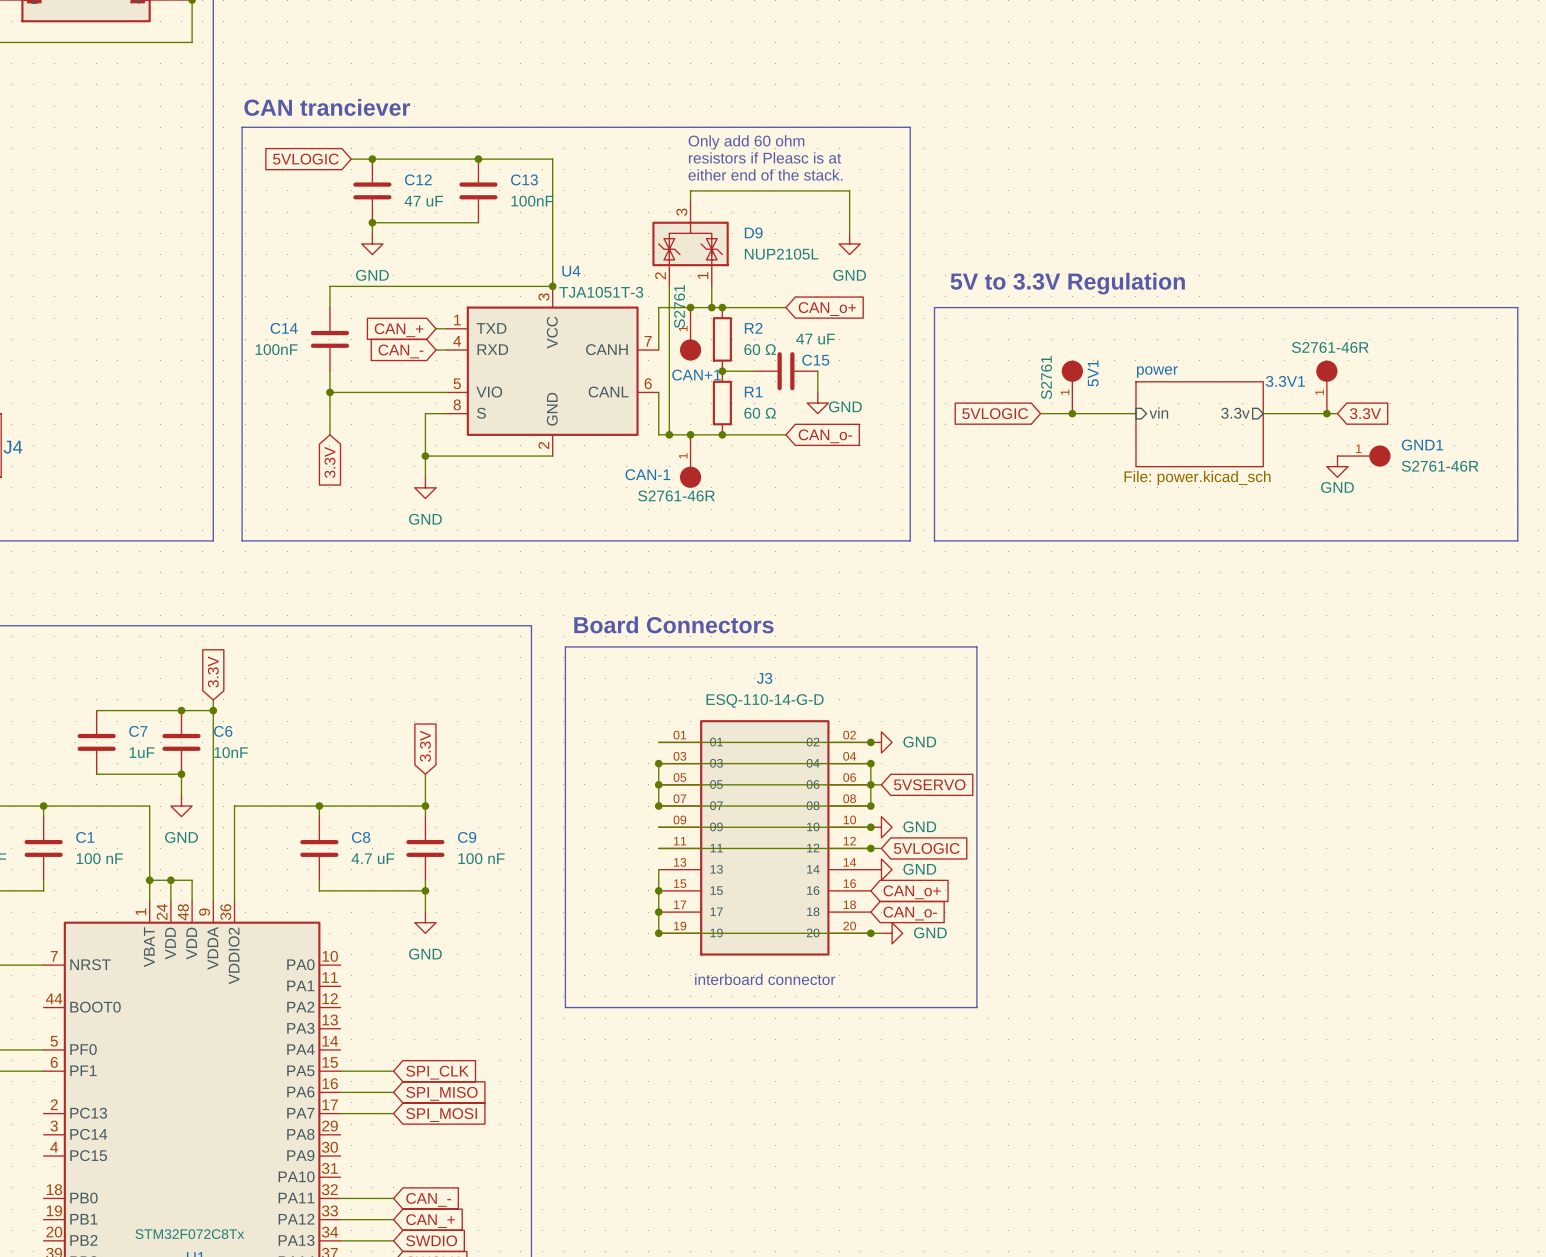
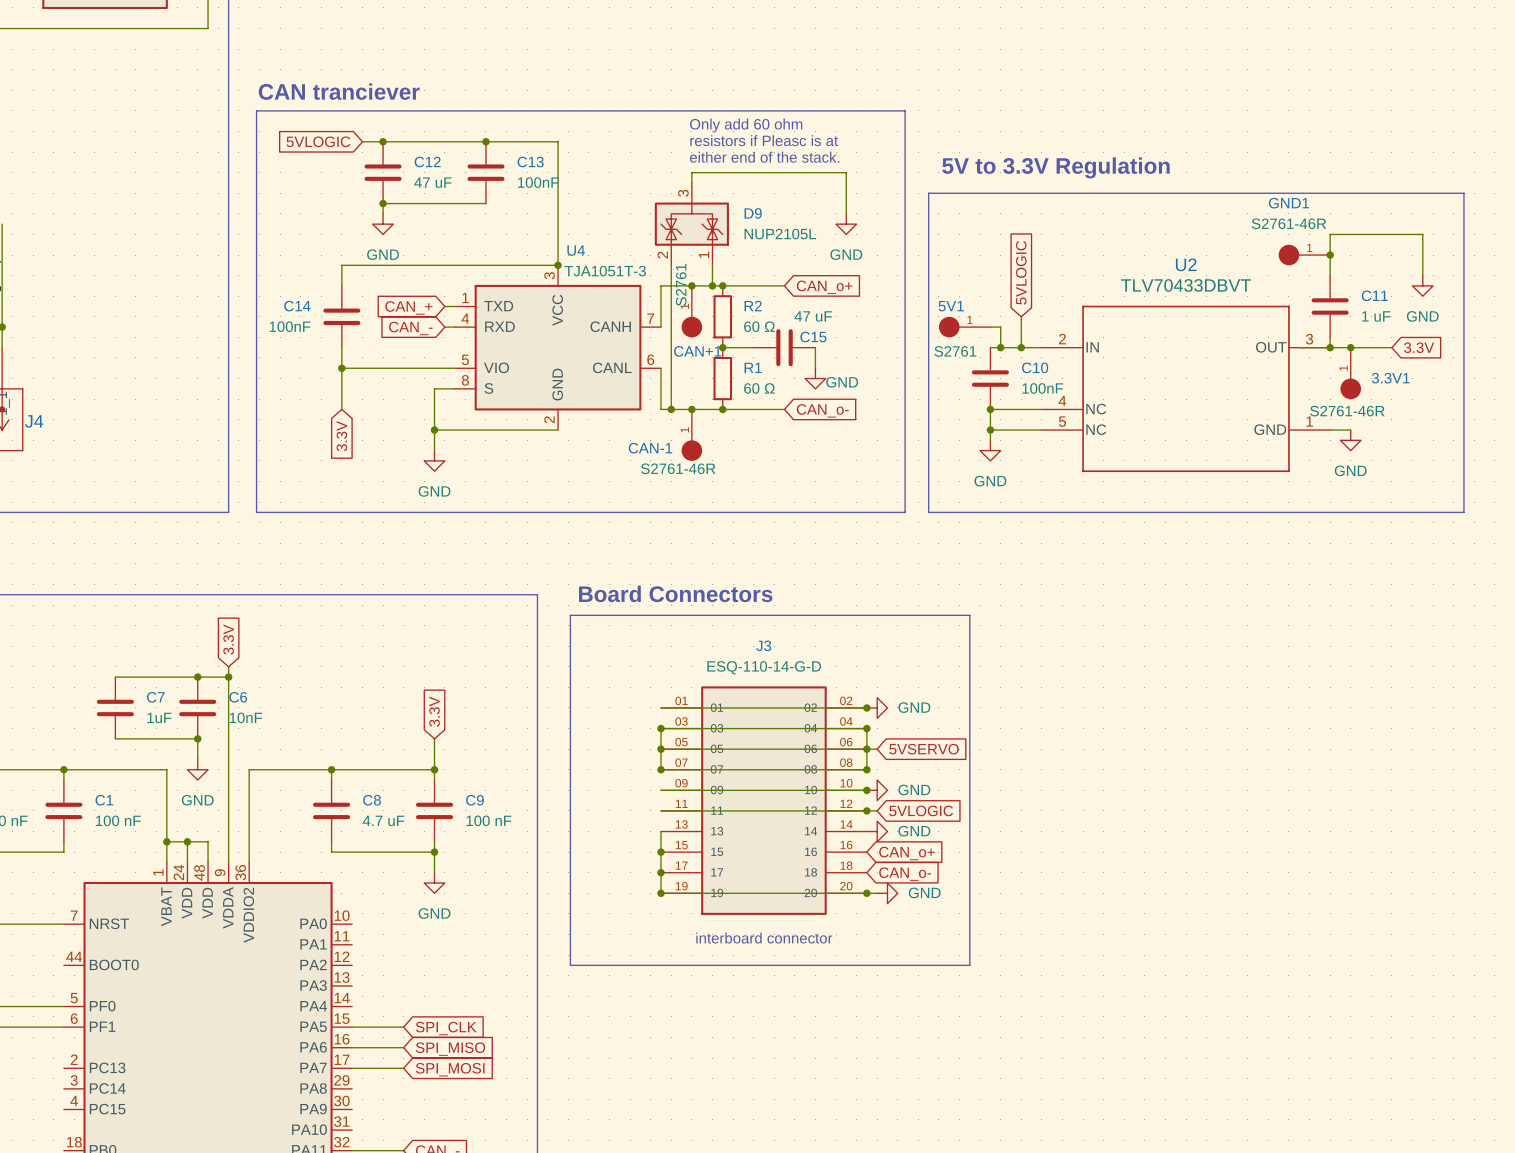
junction: none -> (1330, 255)
text position: 5V to 3.3V Regulation (1067, 283) -> 5V to 3.3V Regulation (1055, 167)
wire: none -> (1330, 275) (1330, 234) (1422, 234) (1422, 275)
line: (934, 307) (1517, 307) (1517, 540) (1485, 540) -> (928, 285) (928, 193) (1463, 193) (1463, 512)
power symbol: none -> GND (1422, 285)
C11: none -> 1 uF (1330, 306)
wire: none -> (1021, 316) (1021, 347)
wire: none -> (990, 327) (1000, 327) (1000, 347)
wire: none -> (1330, 337) (1330, 347)
wire: none -> (990, 347) (1041, 347)
junction: none -> (1000, 347)
junction: none -> (1021, 347)
5V1 rotation: 0° (1072, 371) -> 90° counterclockwise (949, 327)
wire: none -> (1299, 347) (1391, 347)
3.3V1 rotation: 0° (1326, 371) -> 180° (1350, 388)
junction: none -> (1330, 347)
junction: none -> (1350, 347)
5V1 position: (1072, 387) -> (964, 327)
3.3V1 position: (1326, 387) -> (1350, 373)
C10: none -> 100nF (990, 378)
sheet pin: vin (1158, 412) -> none
global label rotation: 0° (995, 413) -> 90° clockwise (1021, 272)
global label position: 5VLOGIC (995, 413) -> 5VLOGIC (1021, 272)
wire: (1040, 413) (1135, 413) -> none
junction: (1072, 413) -> none
U2: none -> TLV70433DBVT (1186, 388)
sheet pin: 3.3v (1235, 413) -> none
wire: (1263, 413) (1337, 413) -> none
junction: (1326, 413) -> none
global label position: 3.3V (1365, 413) -> 3.3V (1419, 347)
sheet power: File: power.kicad_sch (1199, 424) -> none
junction: none -> (990, 409)
wire: none -> (1041, 409) (990, 409) (990, 440)
GND1 name position: GND1 (1422, 445) -> GND1 (1288, 203)
wire: none -> (990, 430) (1041, 430)
junction: none -> (990, 430)
GND1 position: (1364, 456) -> (1304, 255)
GND1 rotation: 0° (1379, 456) -> 180° (1288, 255)
power symbol position: GND (1337, 466) -> GND (1350, 440)
GND1 value position: S2761-46R (1440, 466) -> S2761-46R (1288, 223)
power symbol: none -> GND (990, 450)
power symbol text position: GND (1337, 487) -> GND (1350, 470)

